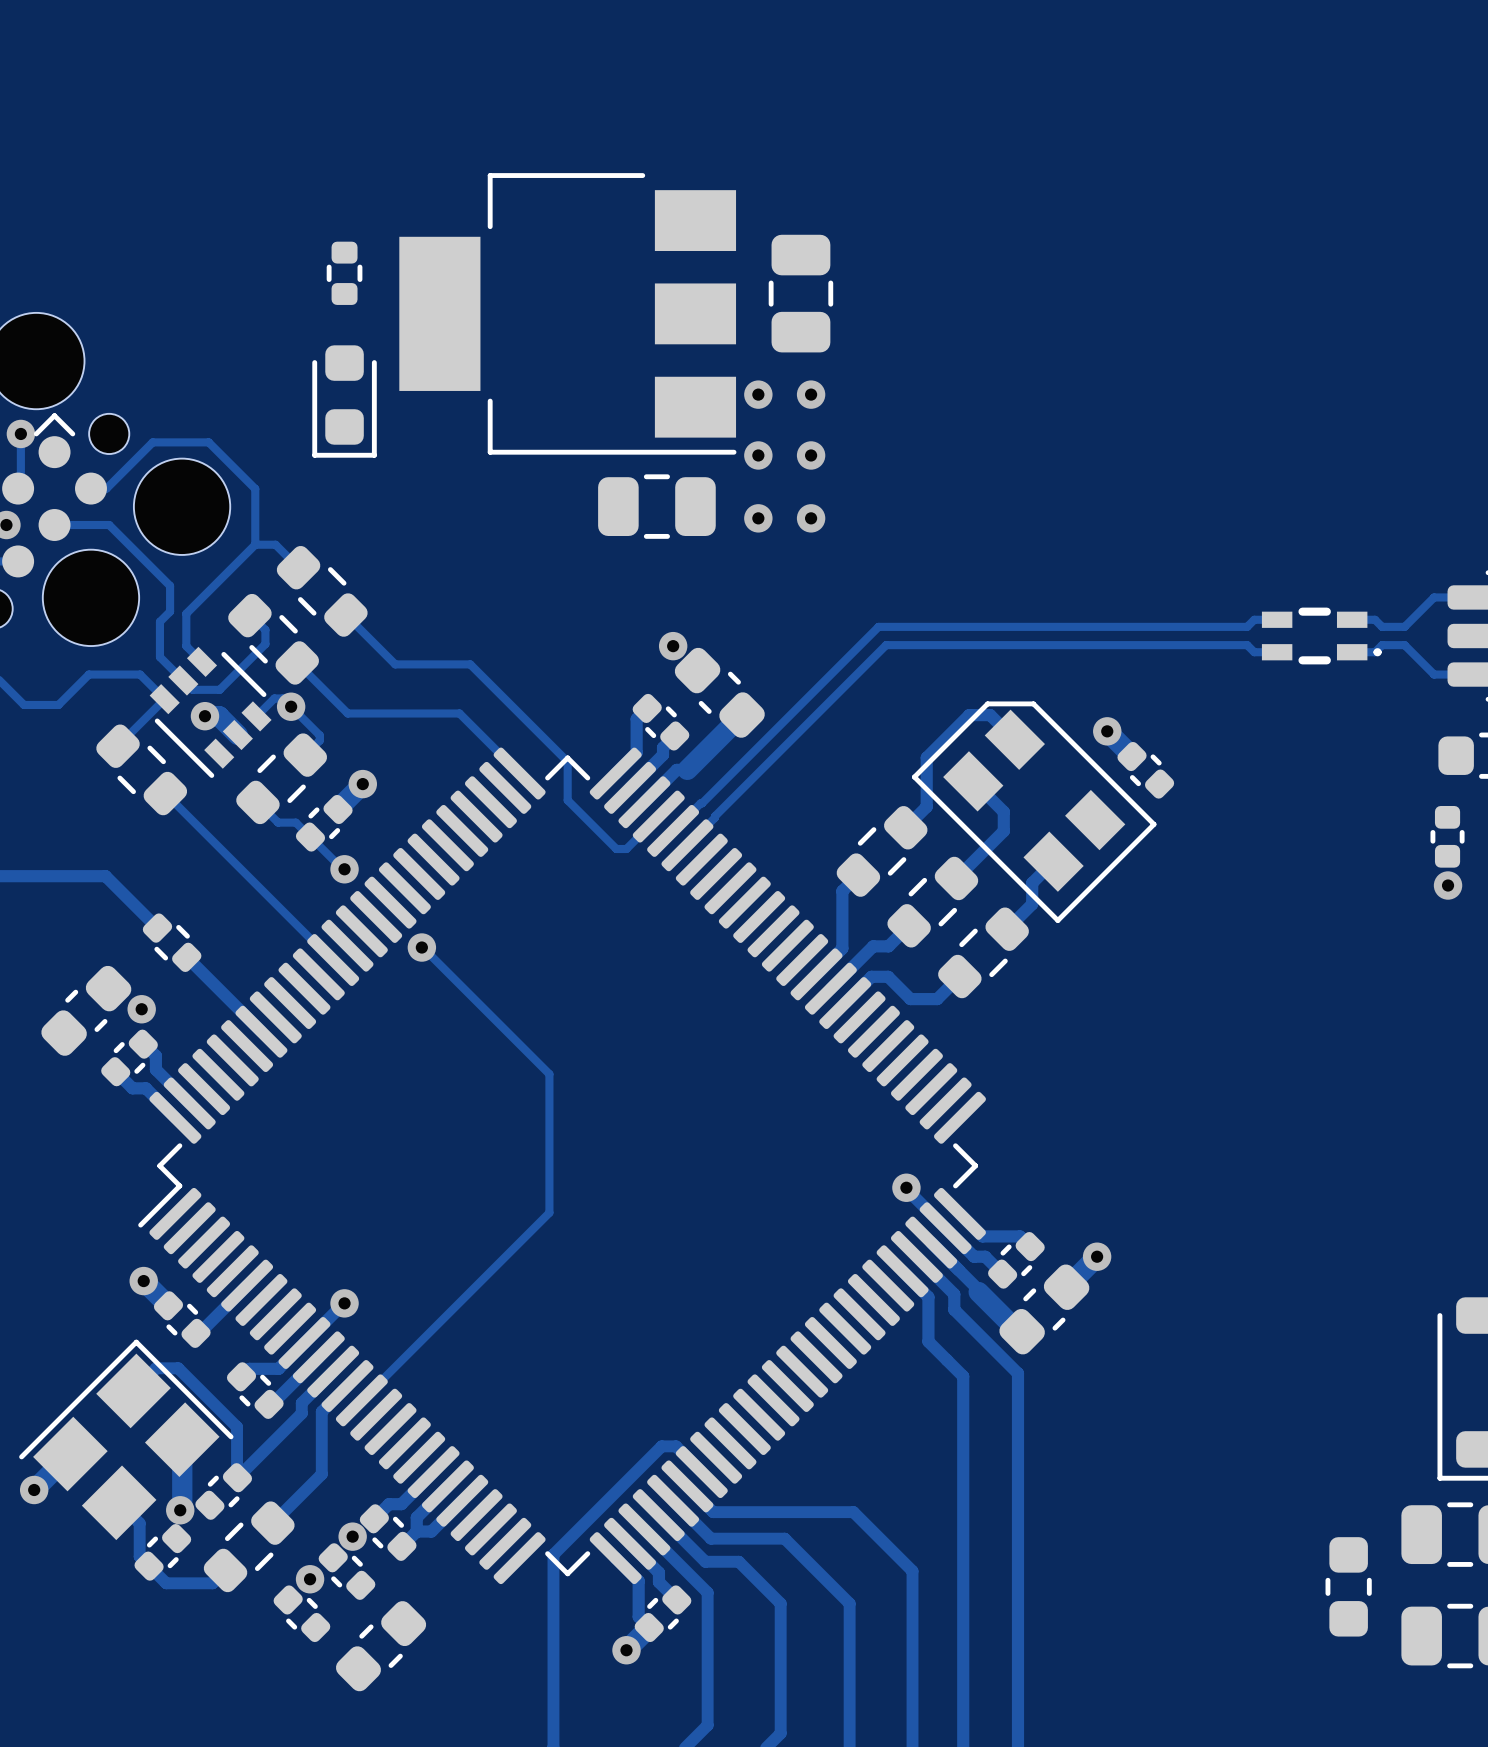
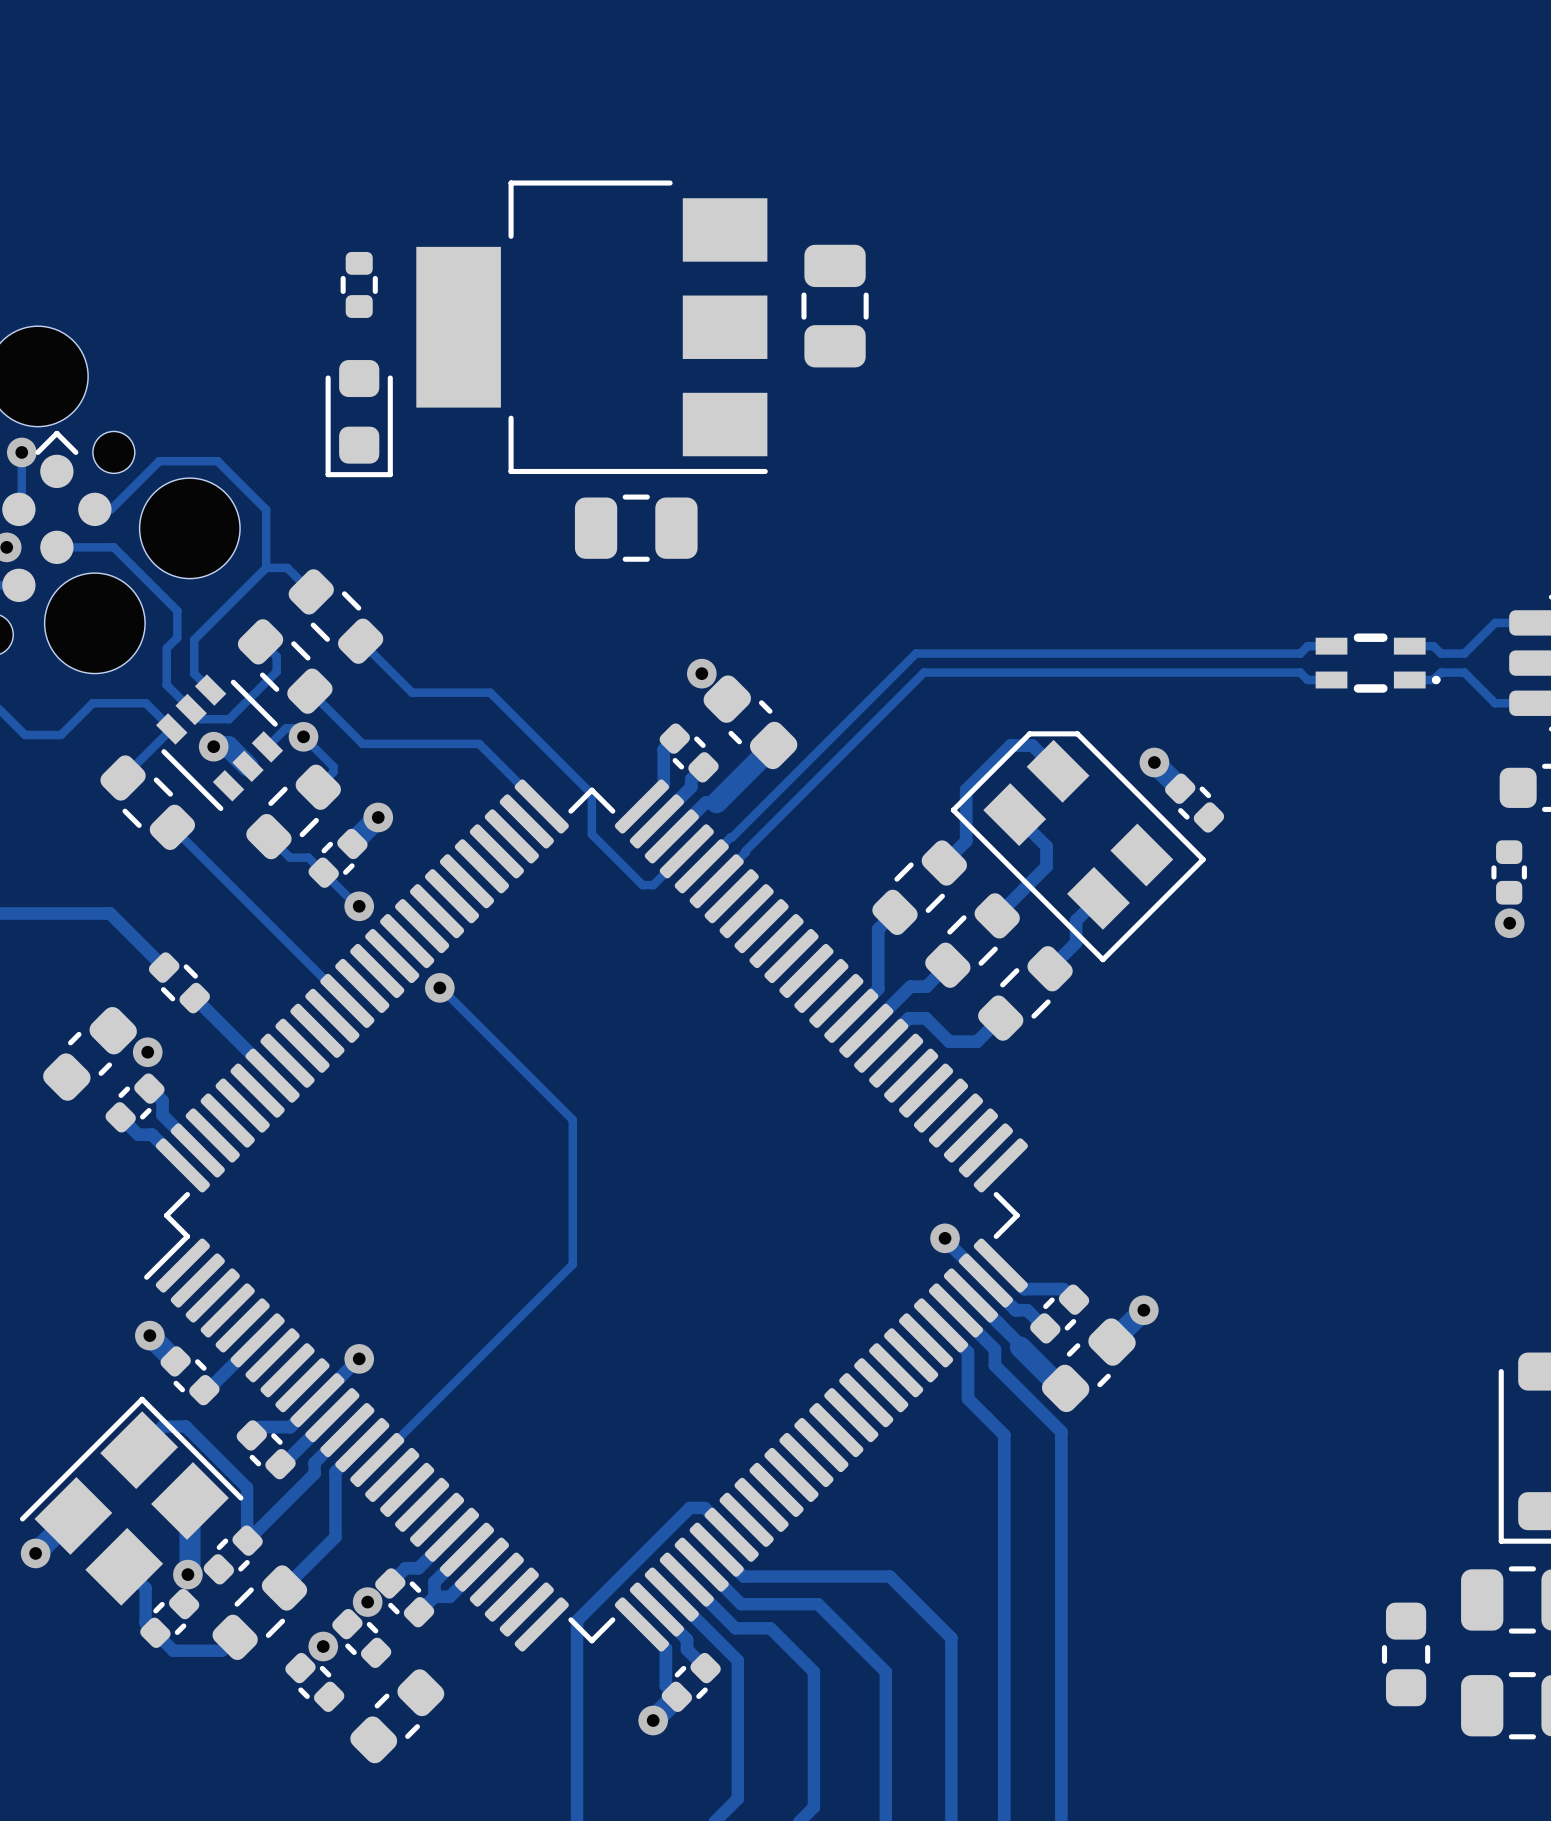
via: (758, 394) -> none
via: (811, 394) -> none
via: (758, 455) -> none
via: (811, 455) -> none
part position: (656, 506) -> (636, 528)
via: (758, 518) -> none
via: (811, 518) -> none

